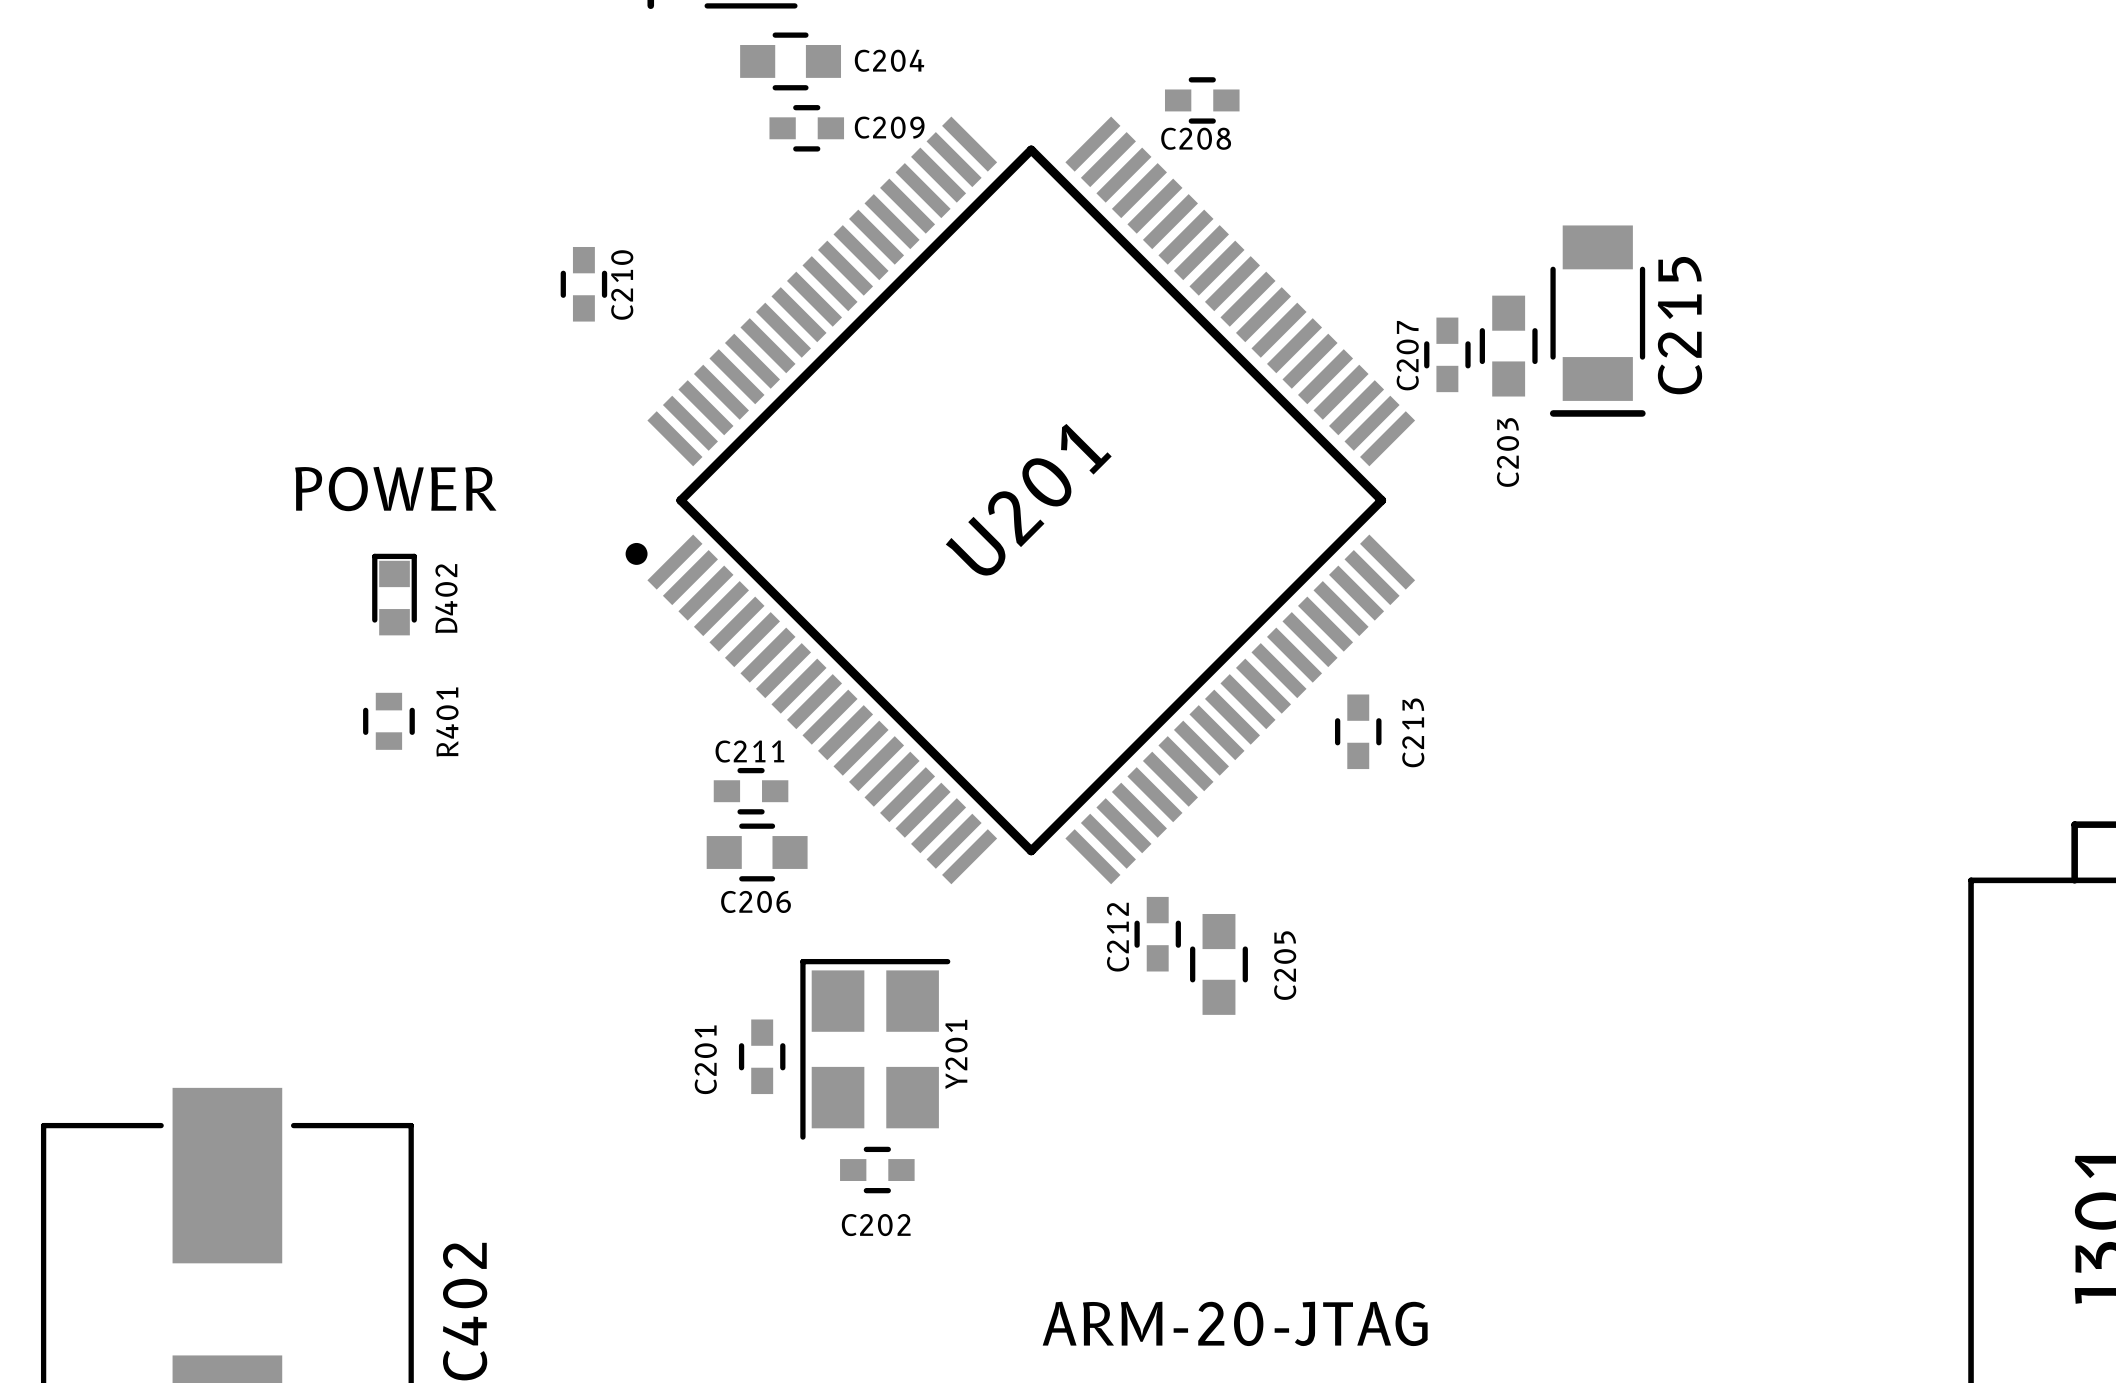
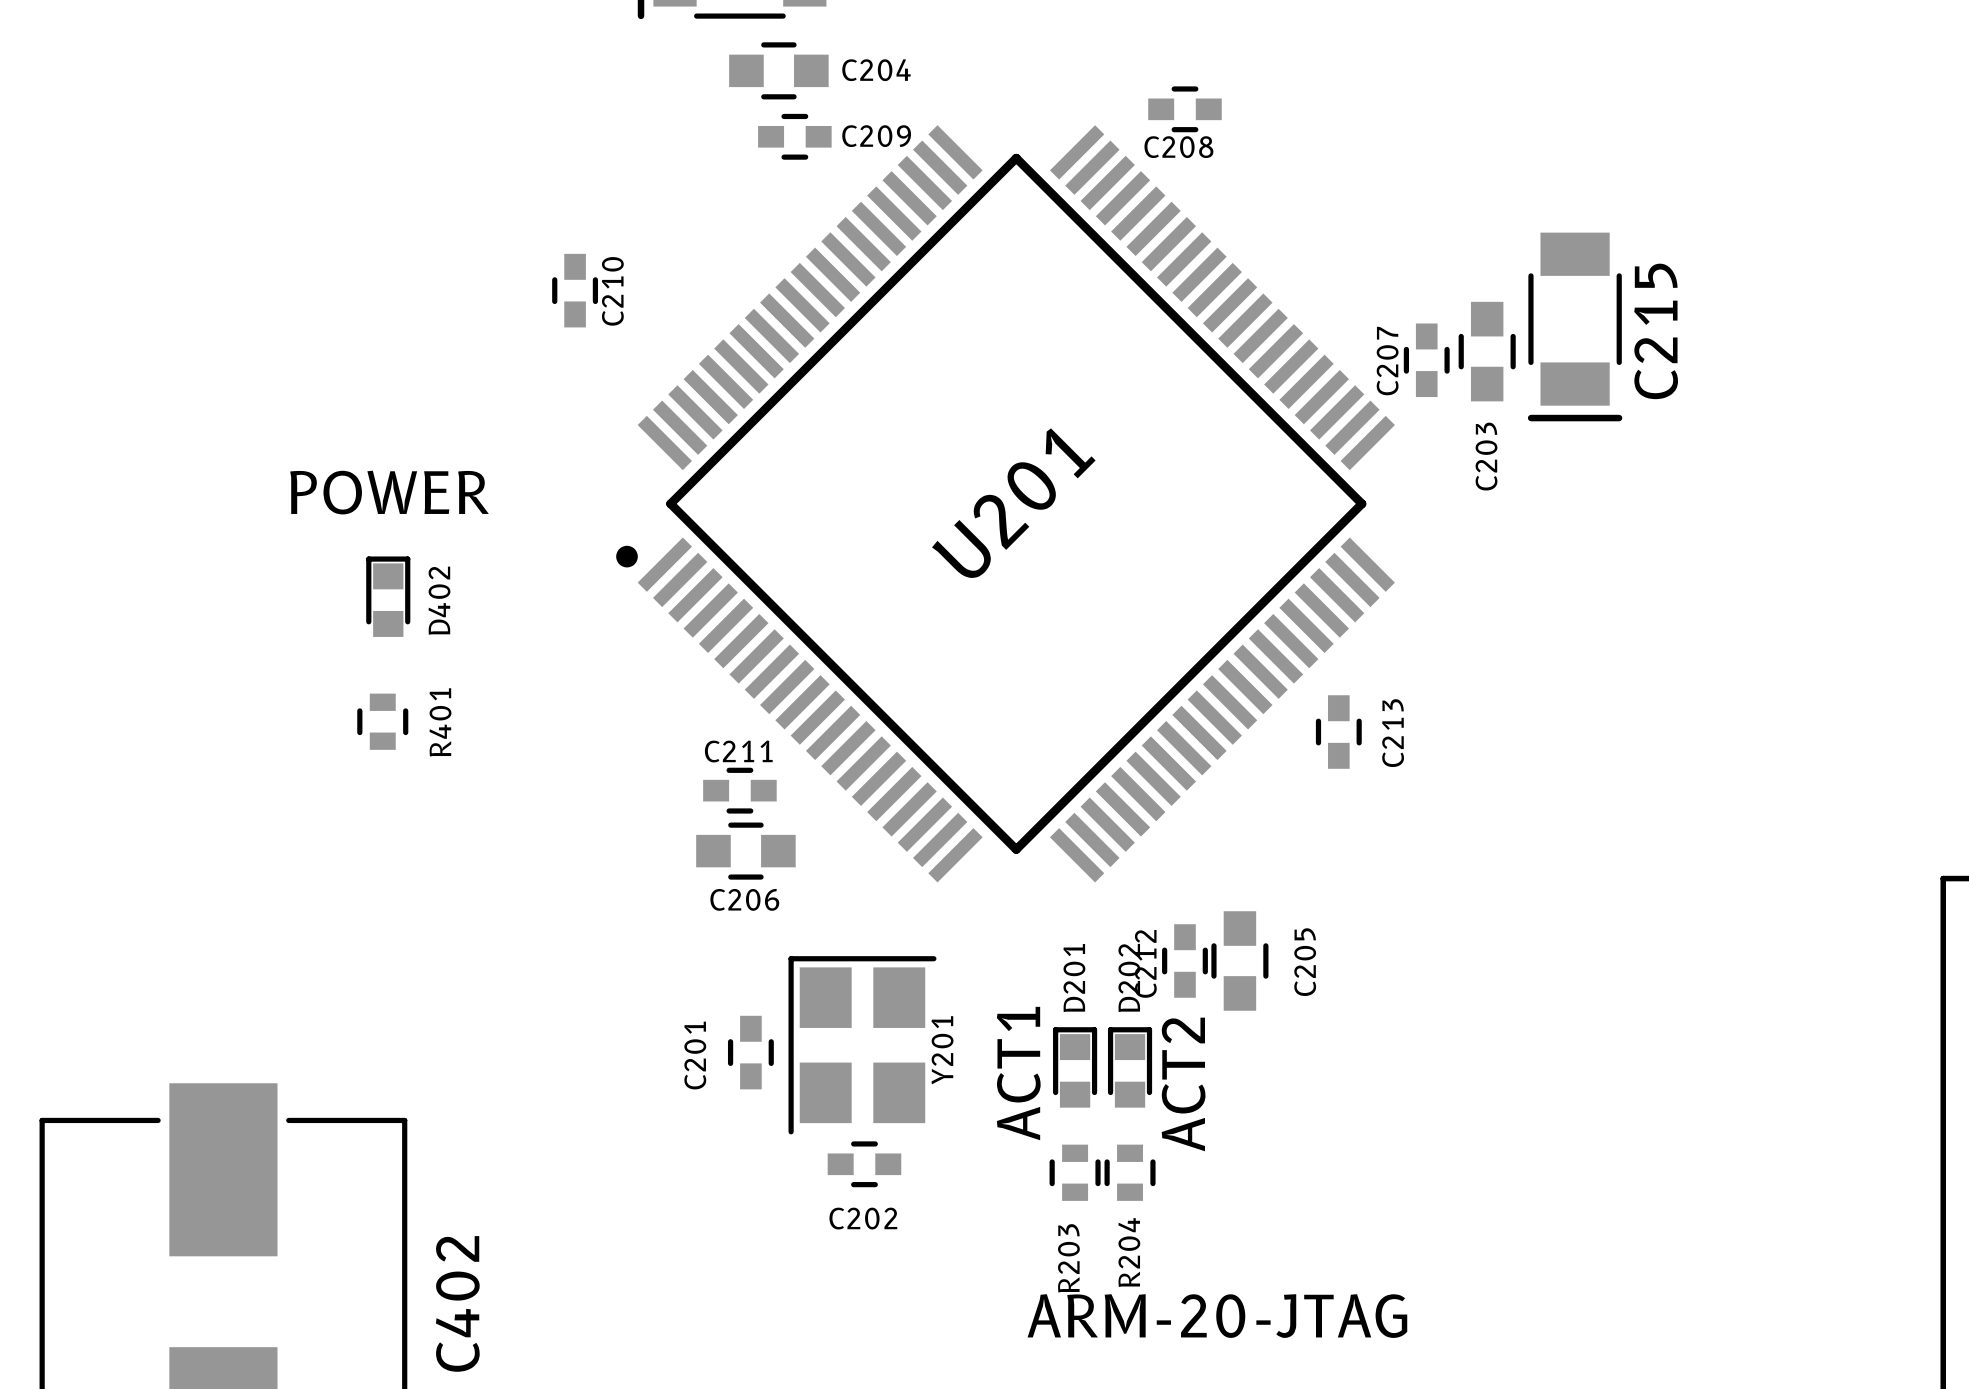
C212 position: (1157, 934) -> (1184, 960)
C205 position: (1218, 964) -> (1239, 960)
D201: none -> ACT1 (1075, 1067)
D202: none -> ACT2 (1130, 1067)
R203: none -> (1075, 1172)
R204: none -> (1130, 1172)

